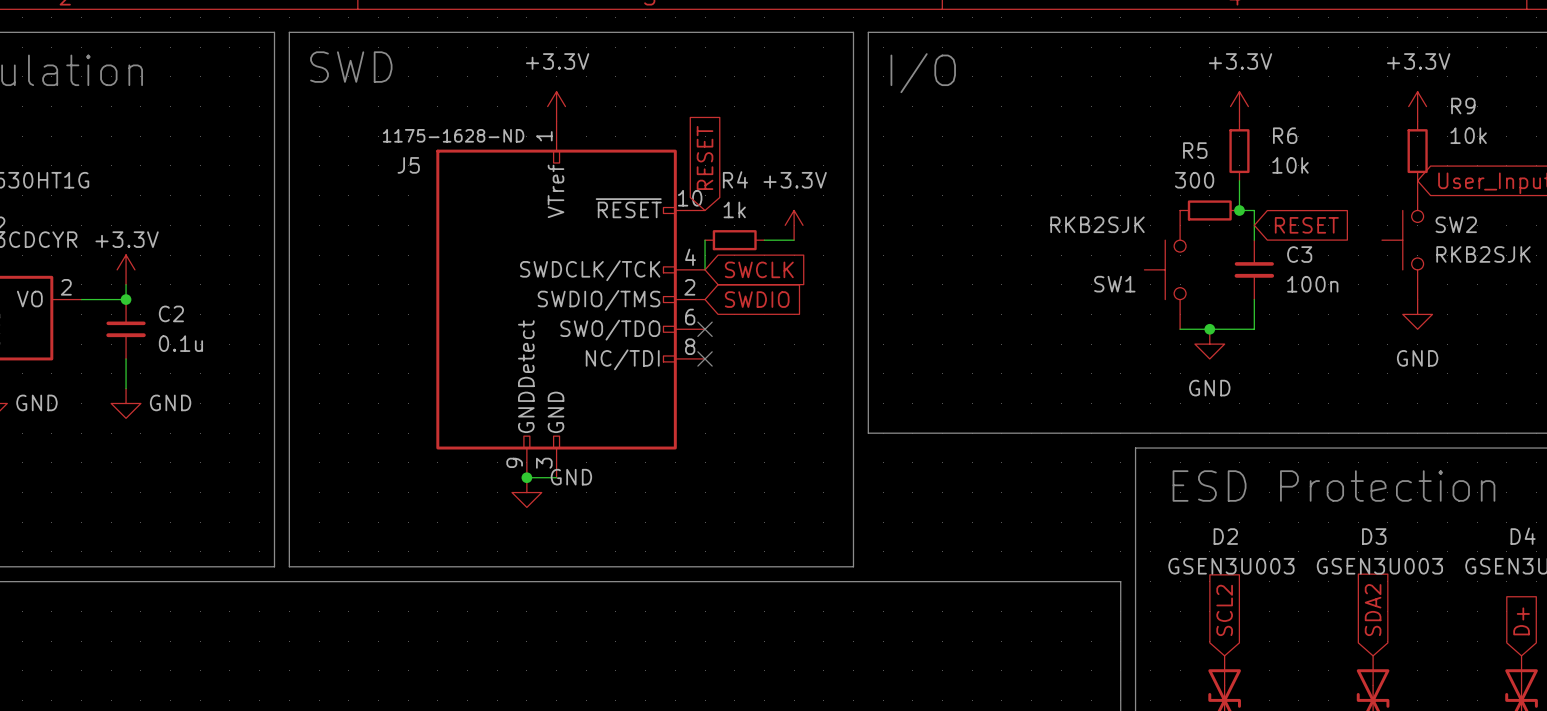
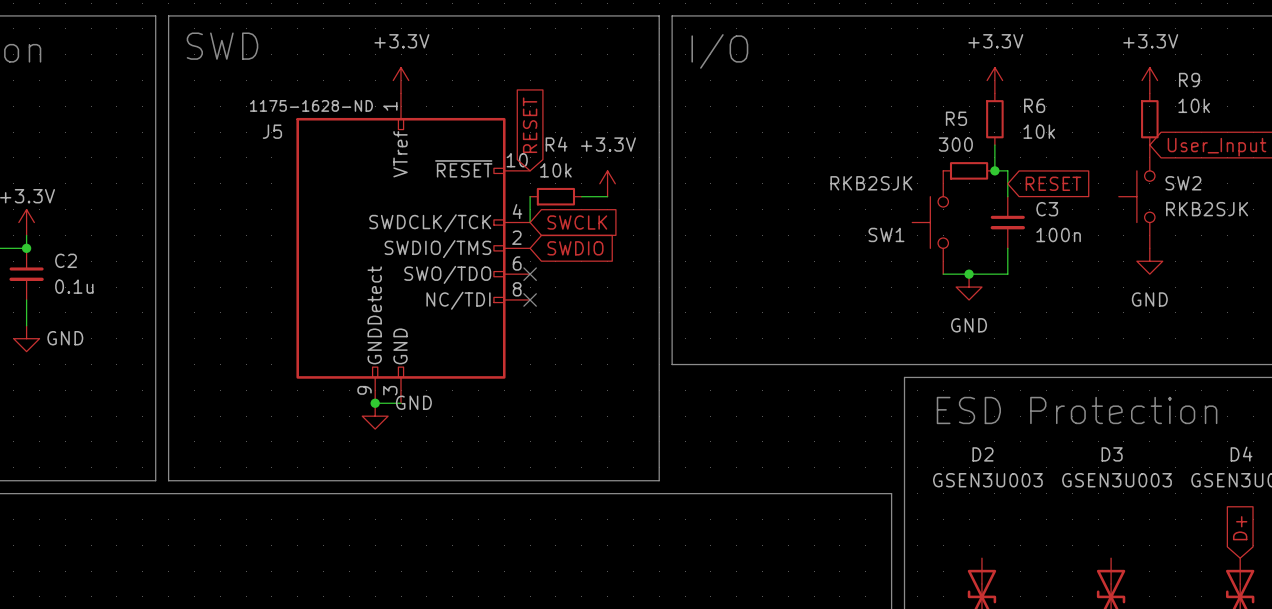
R4 value: 1k (734, 209) -> 10k (555, 170)
global label: SCL2 (1224, 610) -> none
global label: SDA2 (1373, 610) -> none

